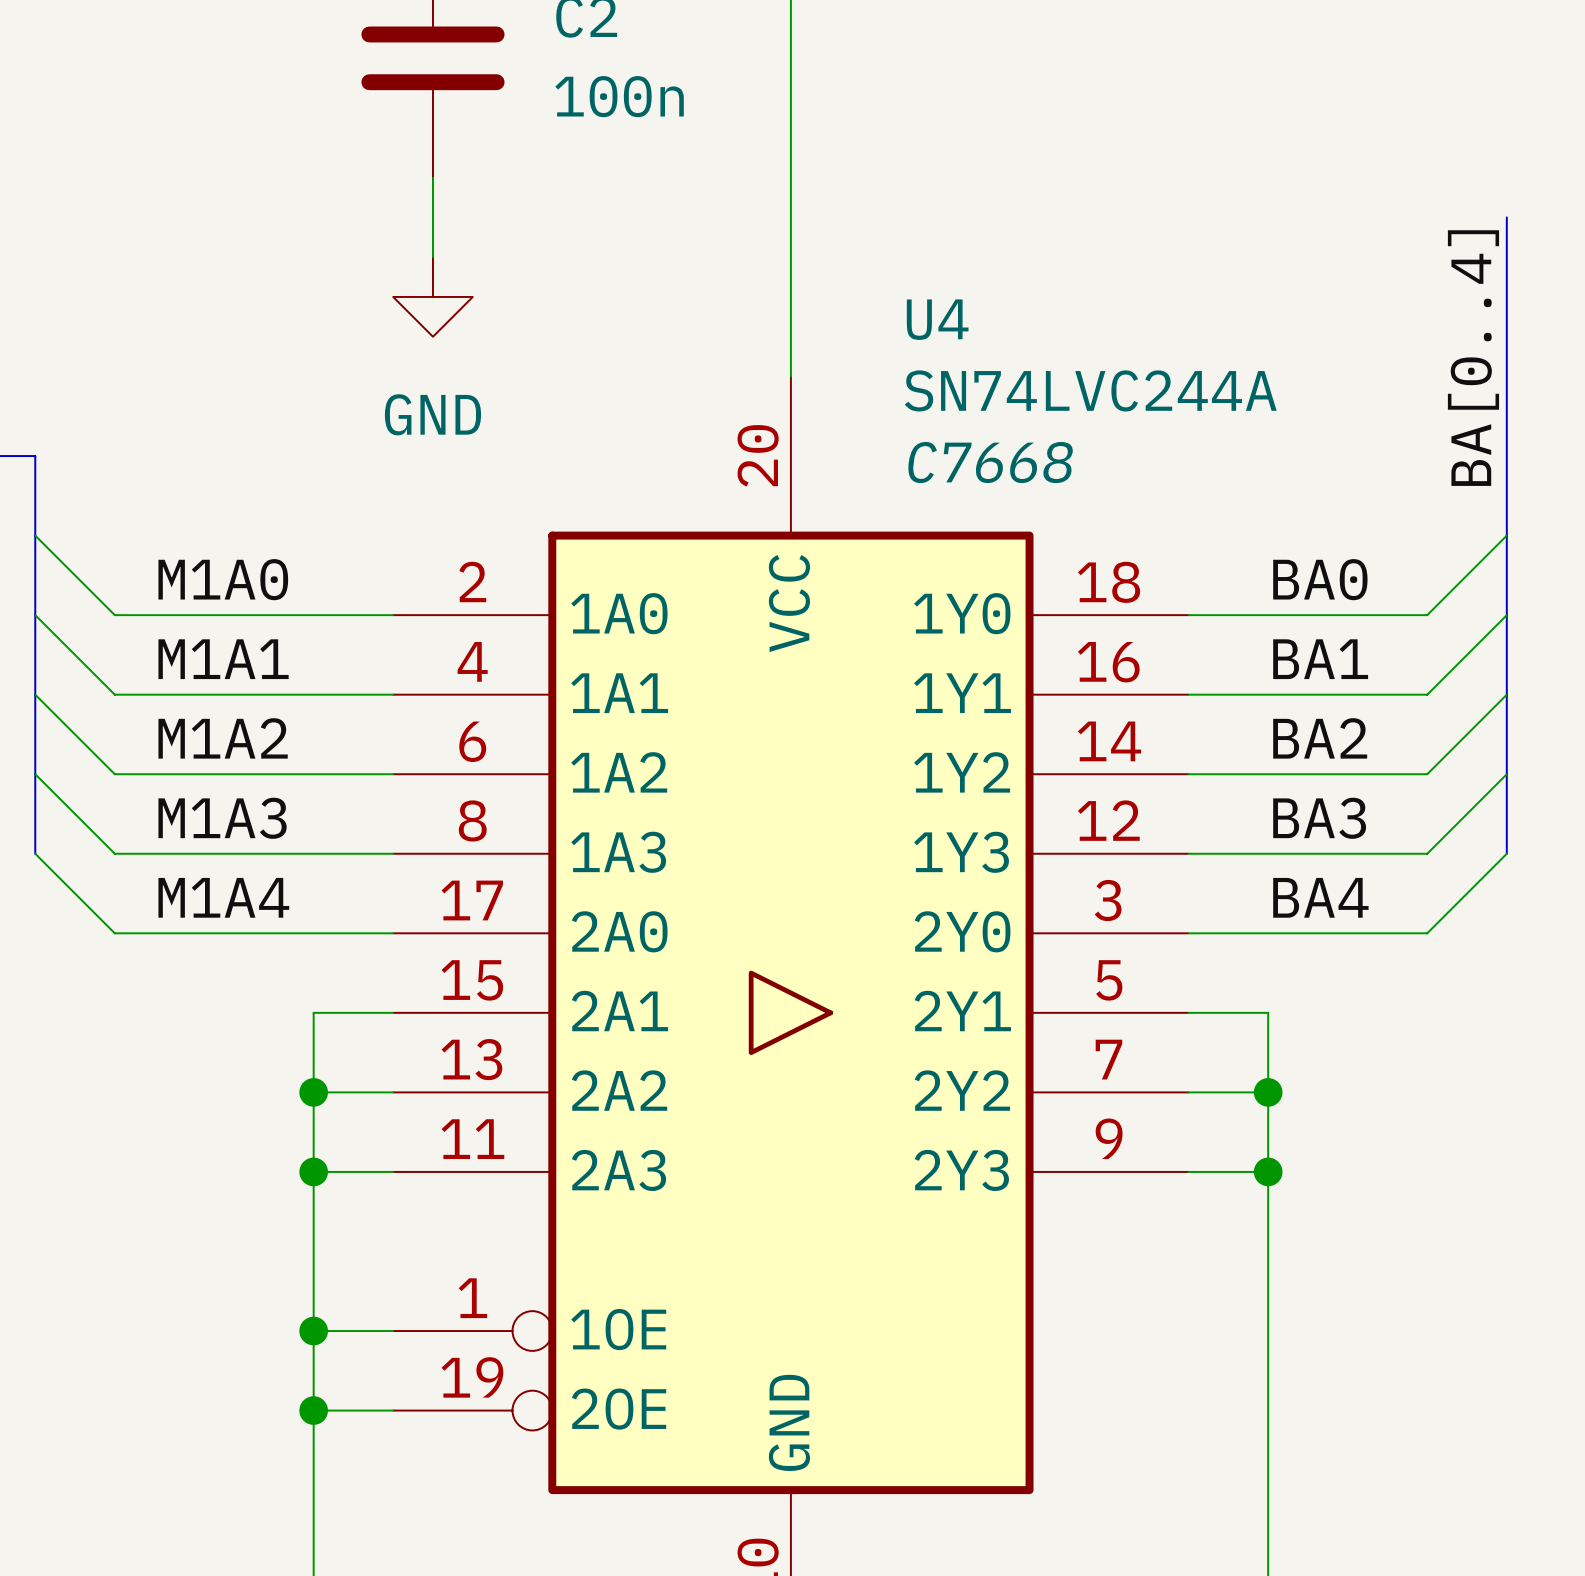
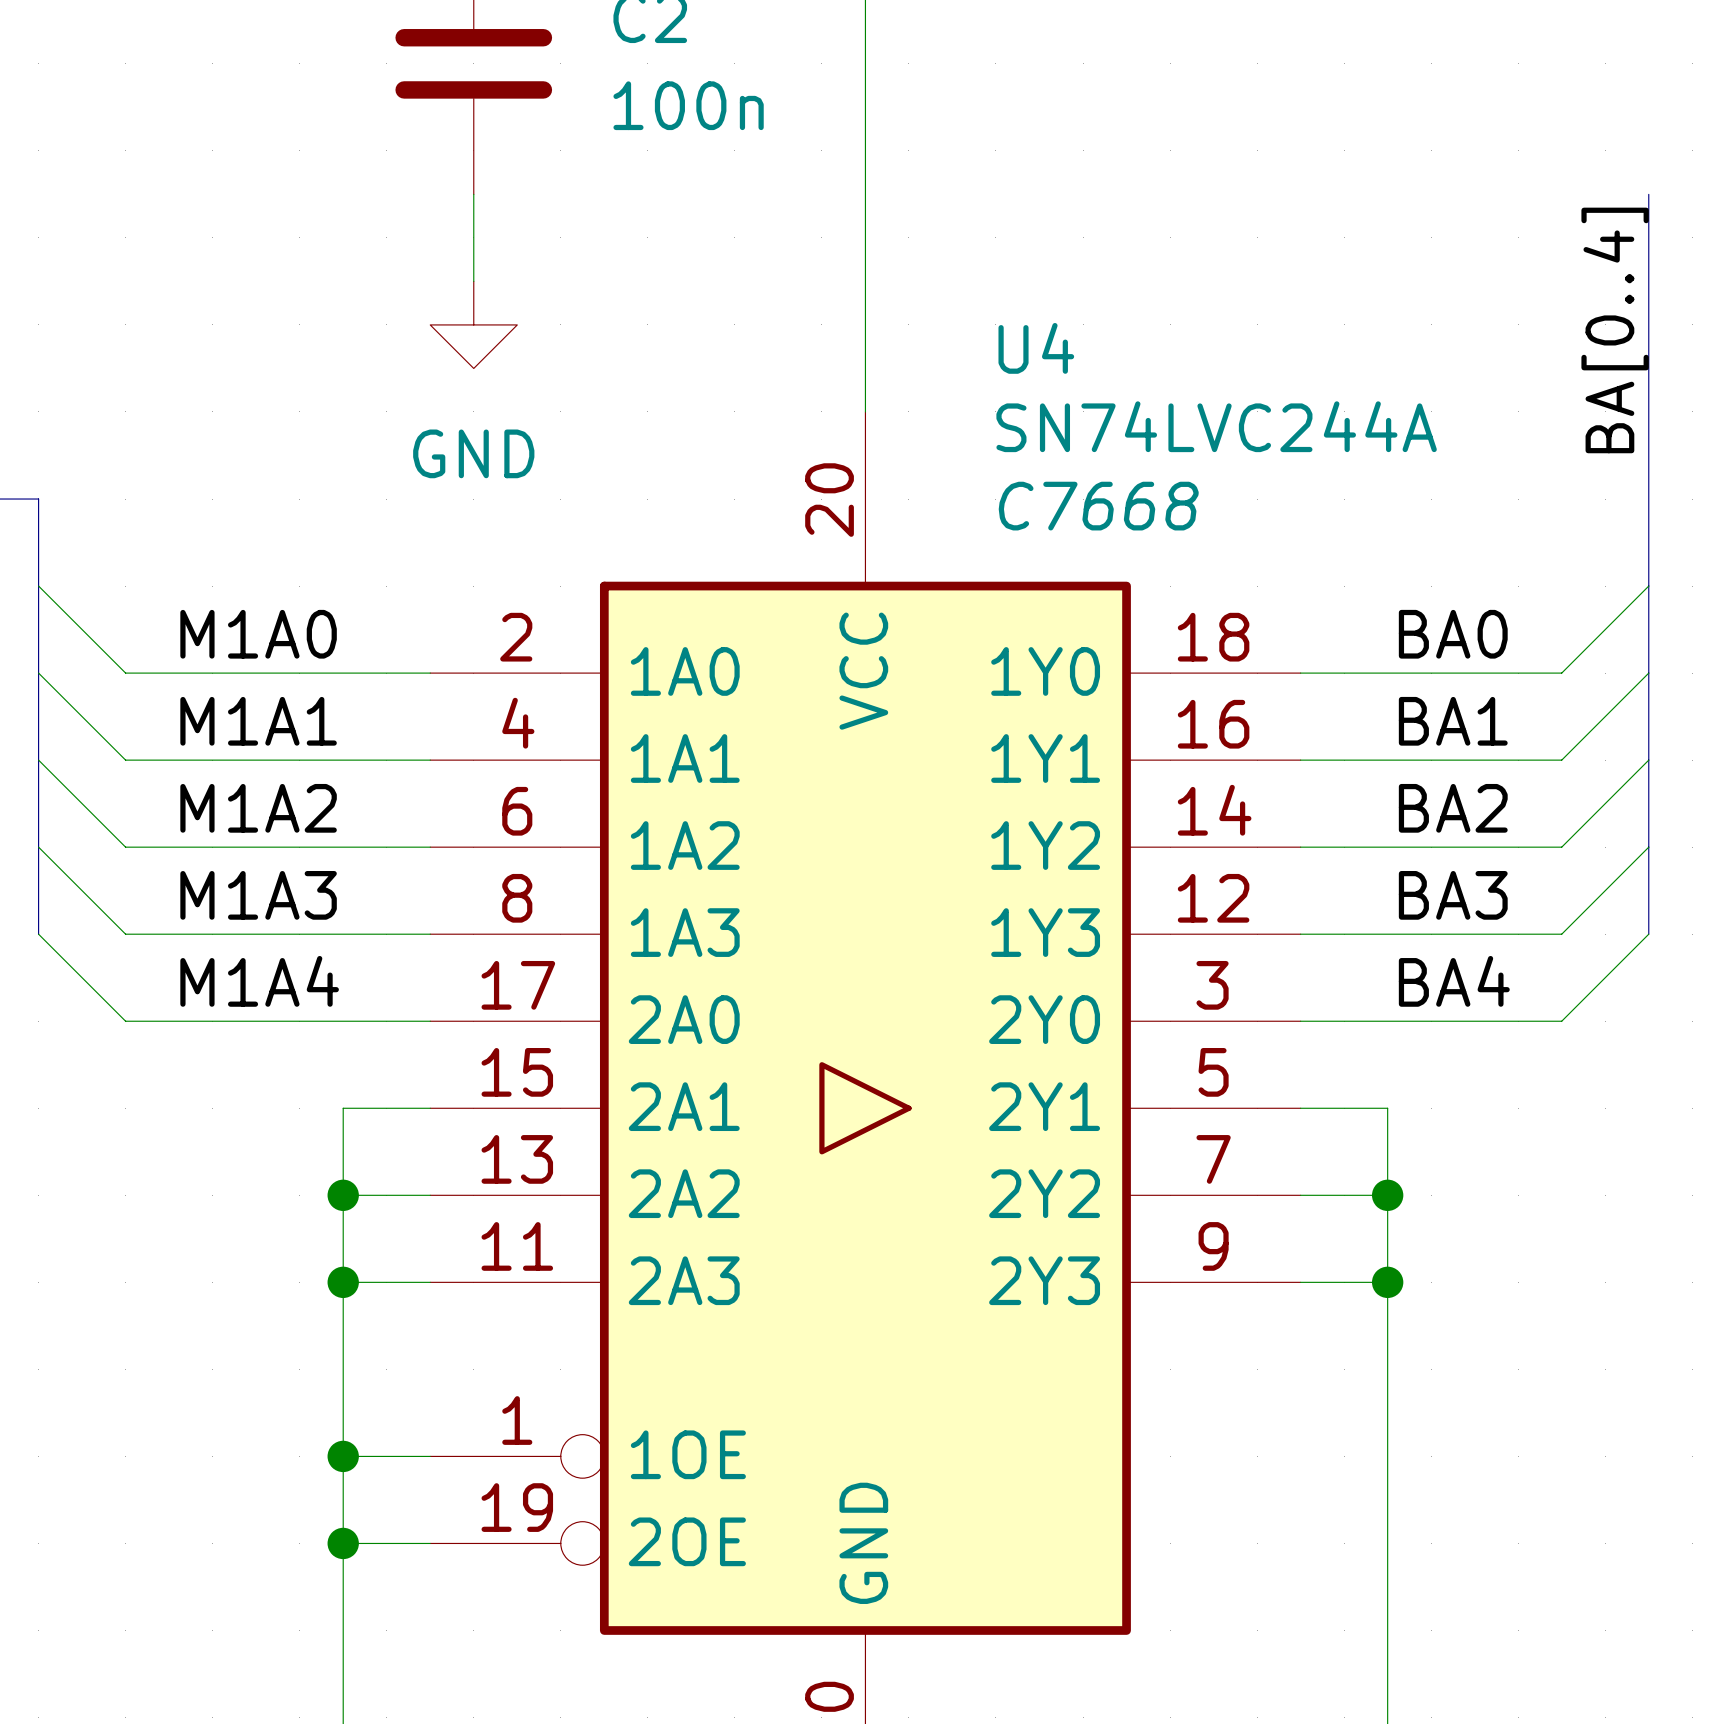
bus: none -> (1648, 194) (1648, 237)
label position: BA[0..4] (1473, 358) -> BA[0..4] (1615, 330)

